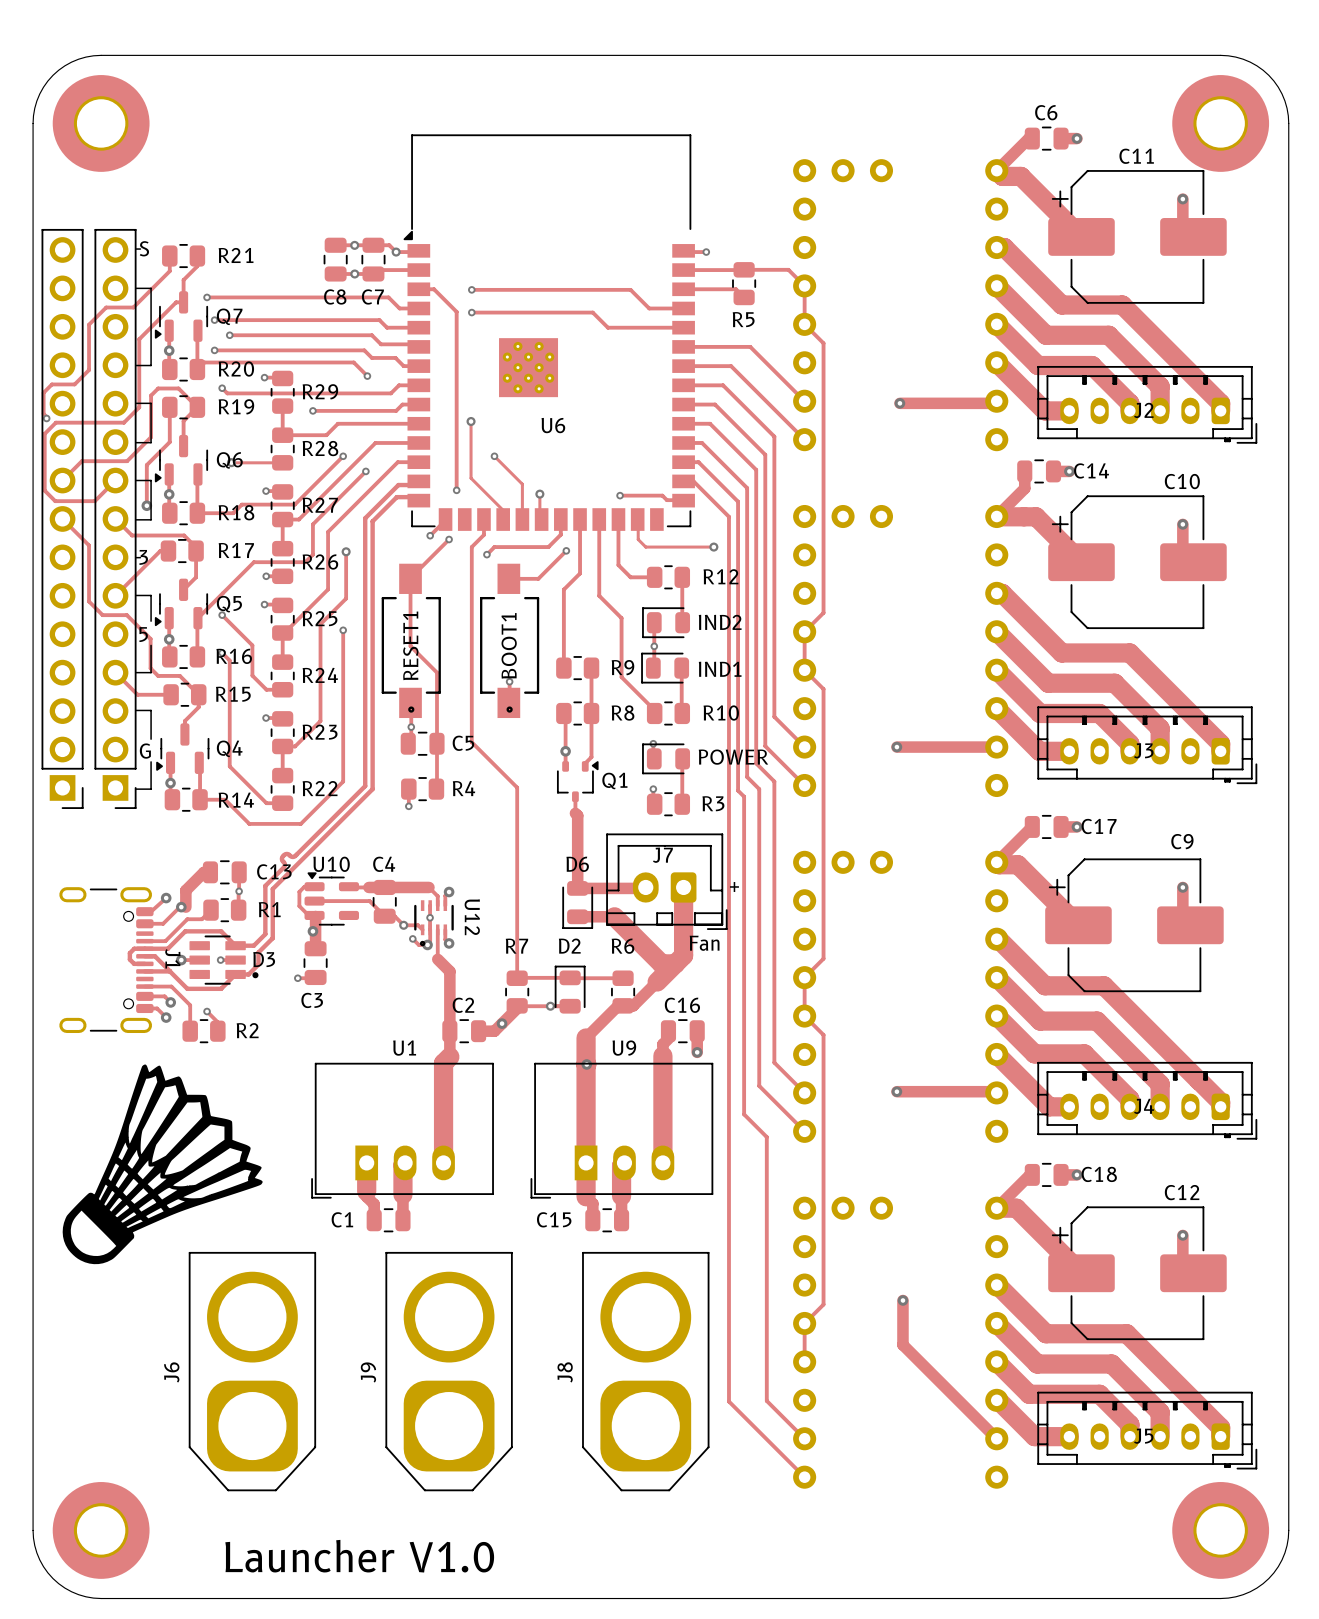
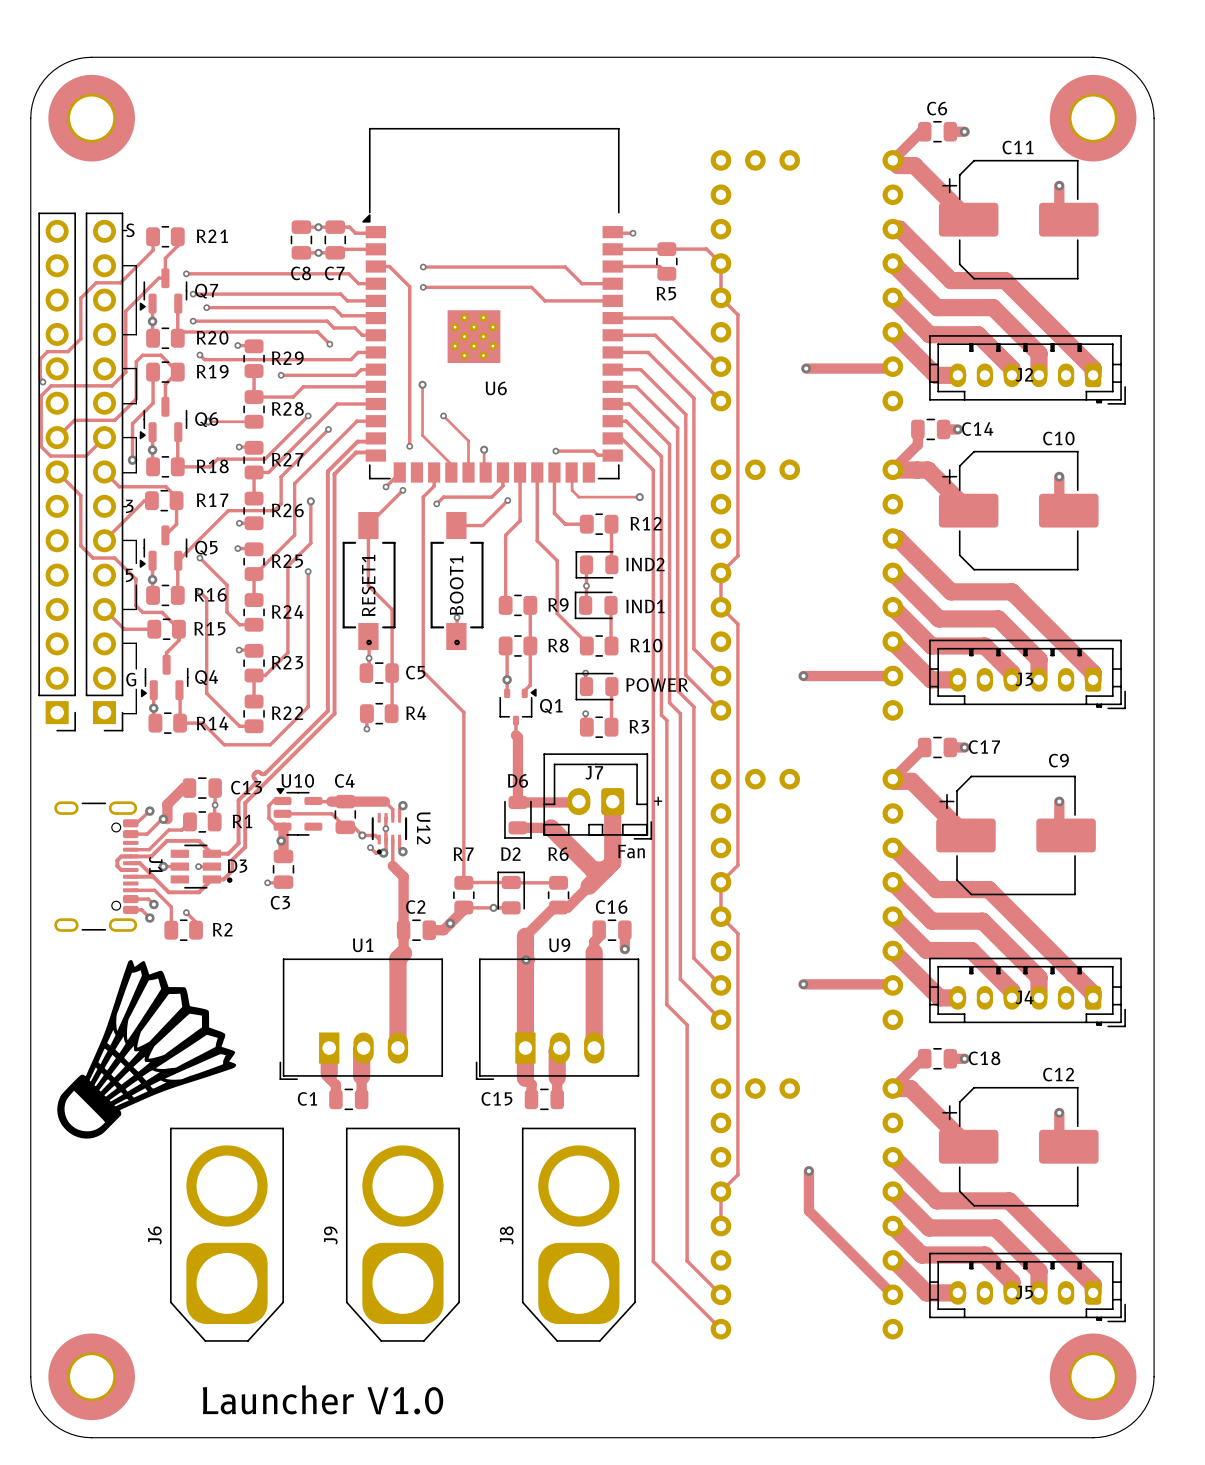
via: (396, 252) -> none

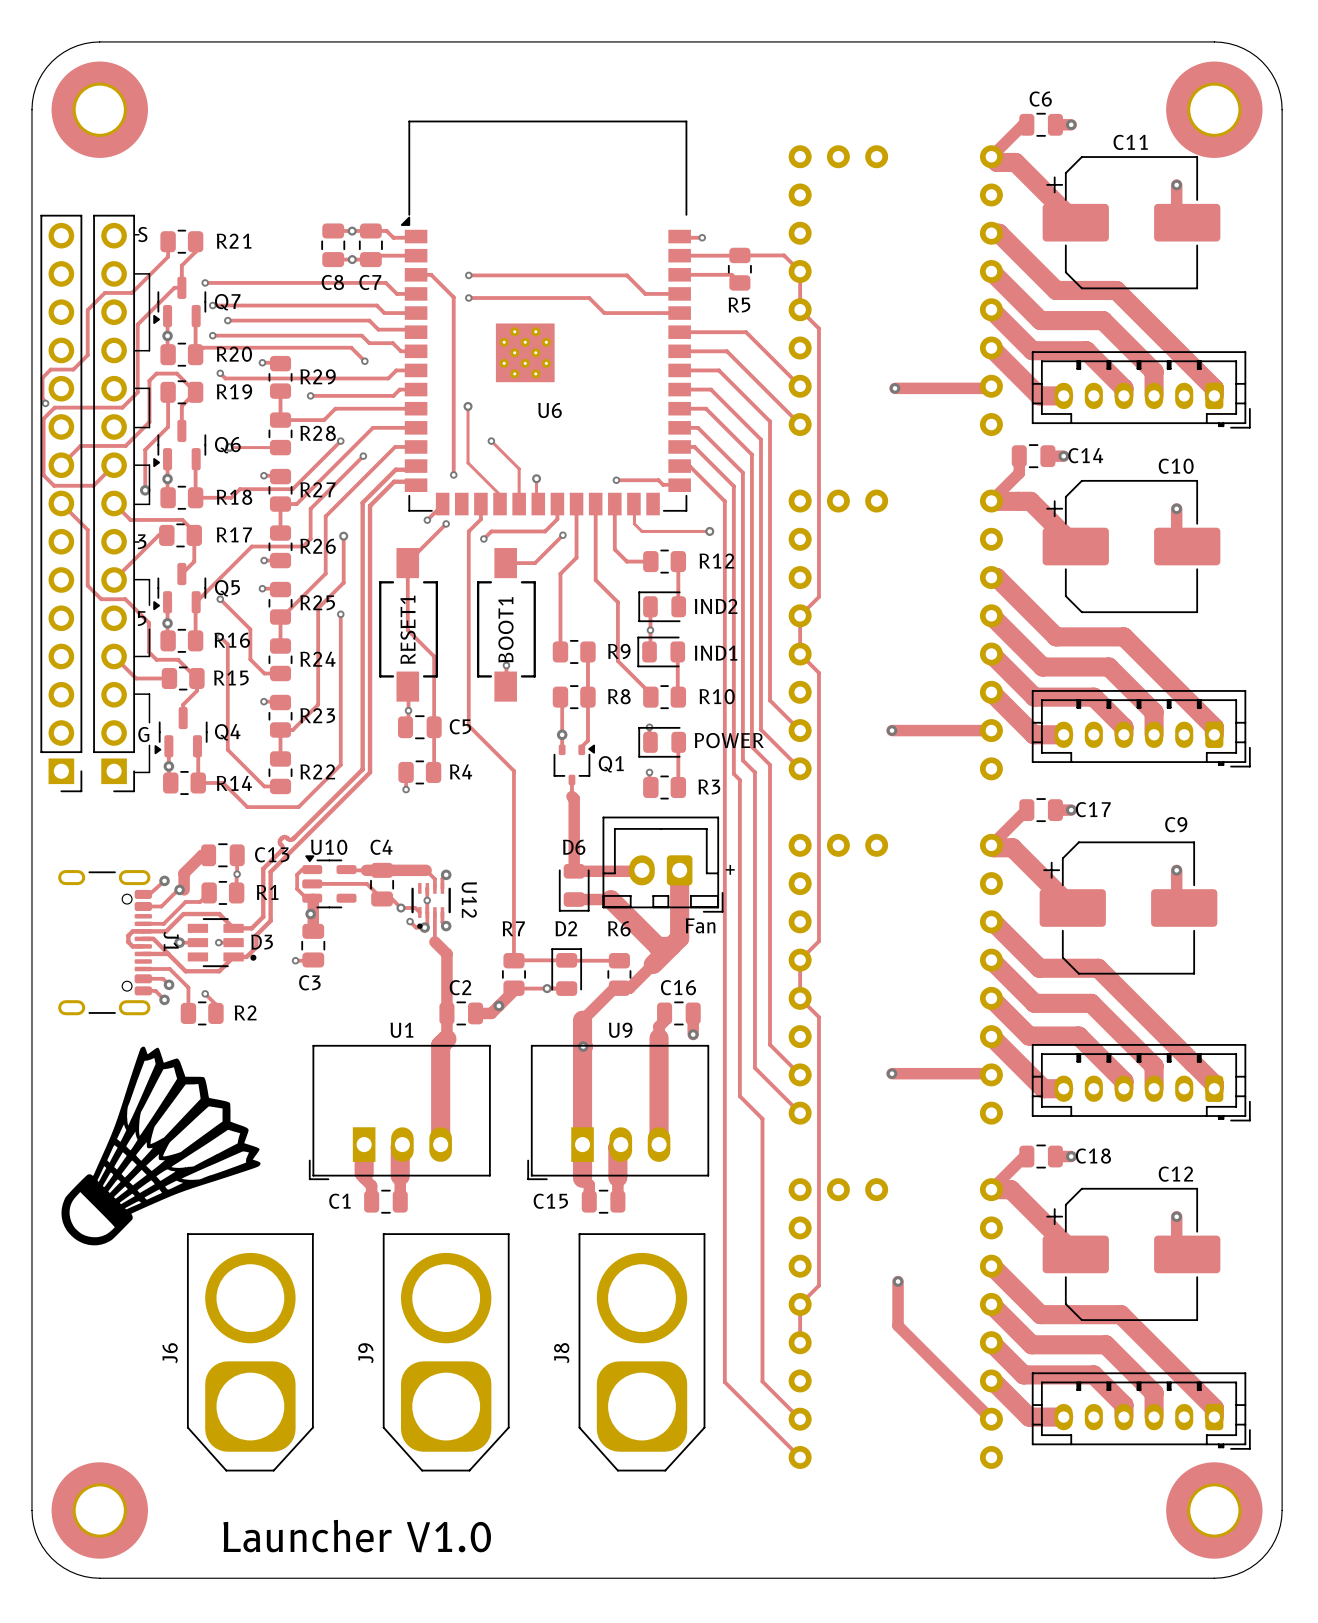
J2 name: J2 (1024, 374) -> none
RESET1 footprint: [342, 512, 396, 651] -> [379, 548, 438, 702]
BOOT1 footprint: [430, 512, 484, 651] -> [476, 548, 536, 702]
J3 name: J3 (1024, 679) -> none
J7 name: J7 (594, 772) -> none
J4 name: J4 (1024, 997) -> none
J5 name: J5 (1024, 1292) -> none

